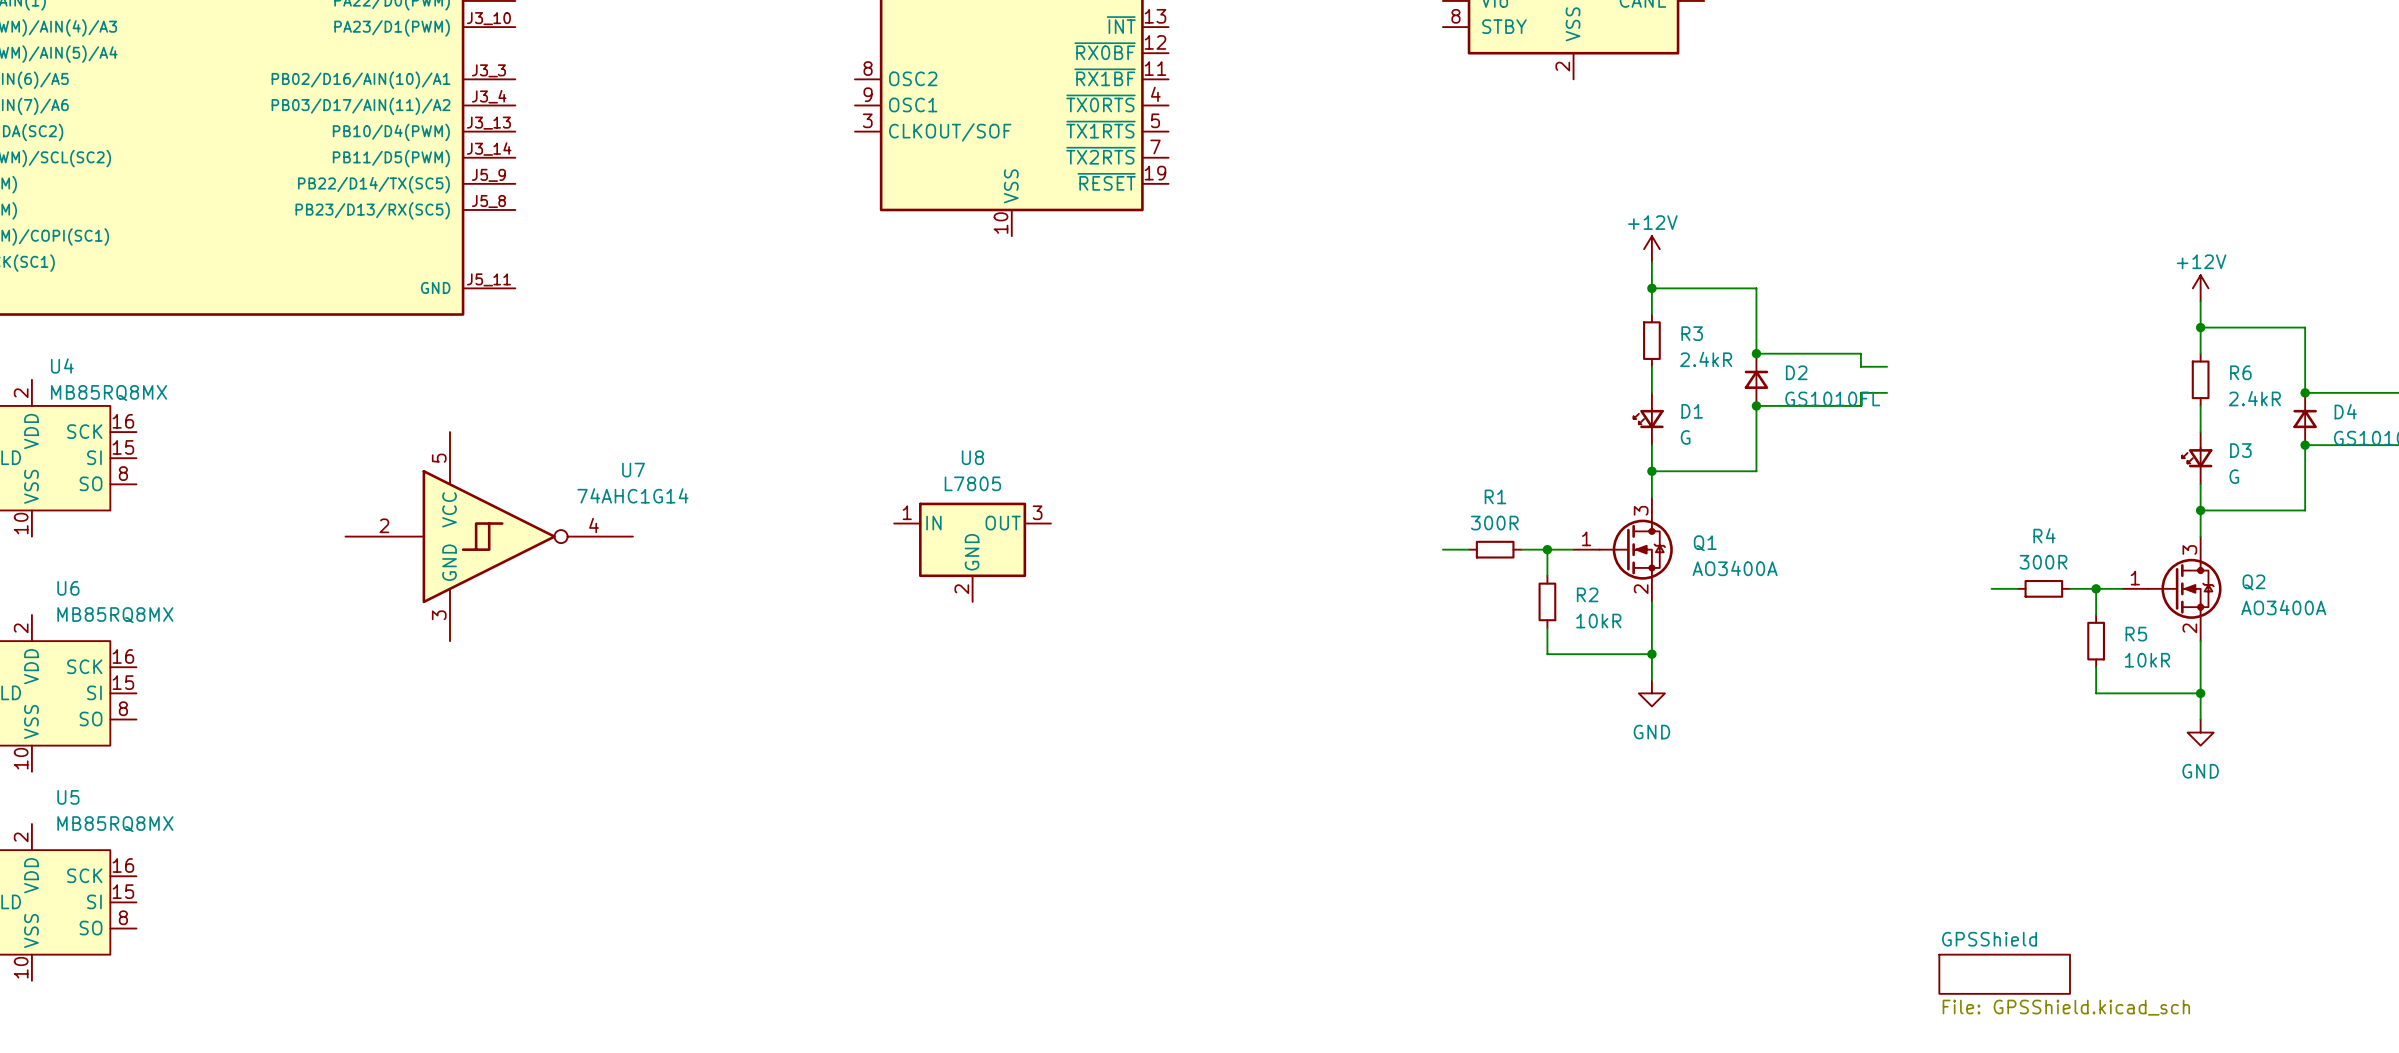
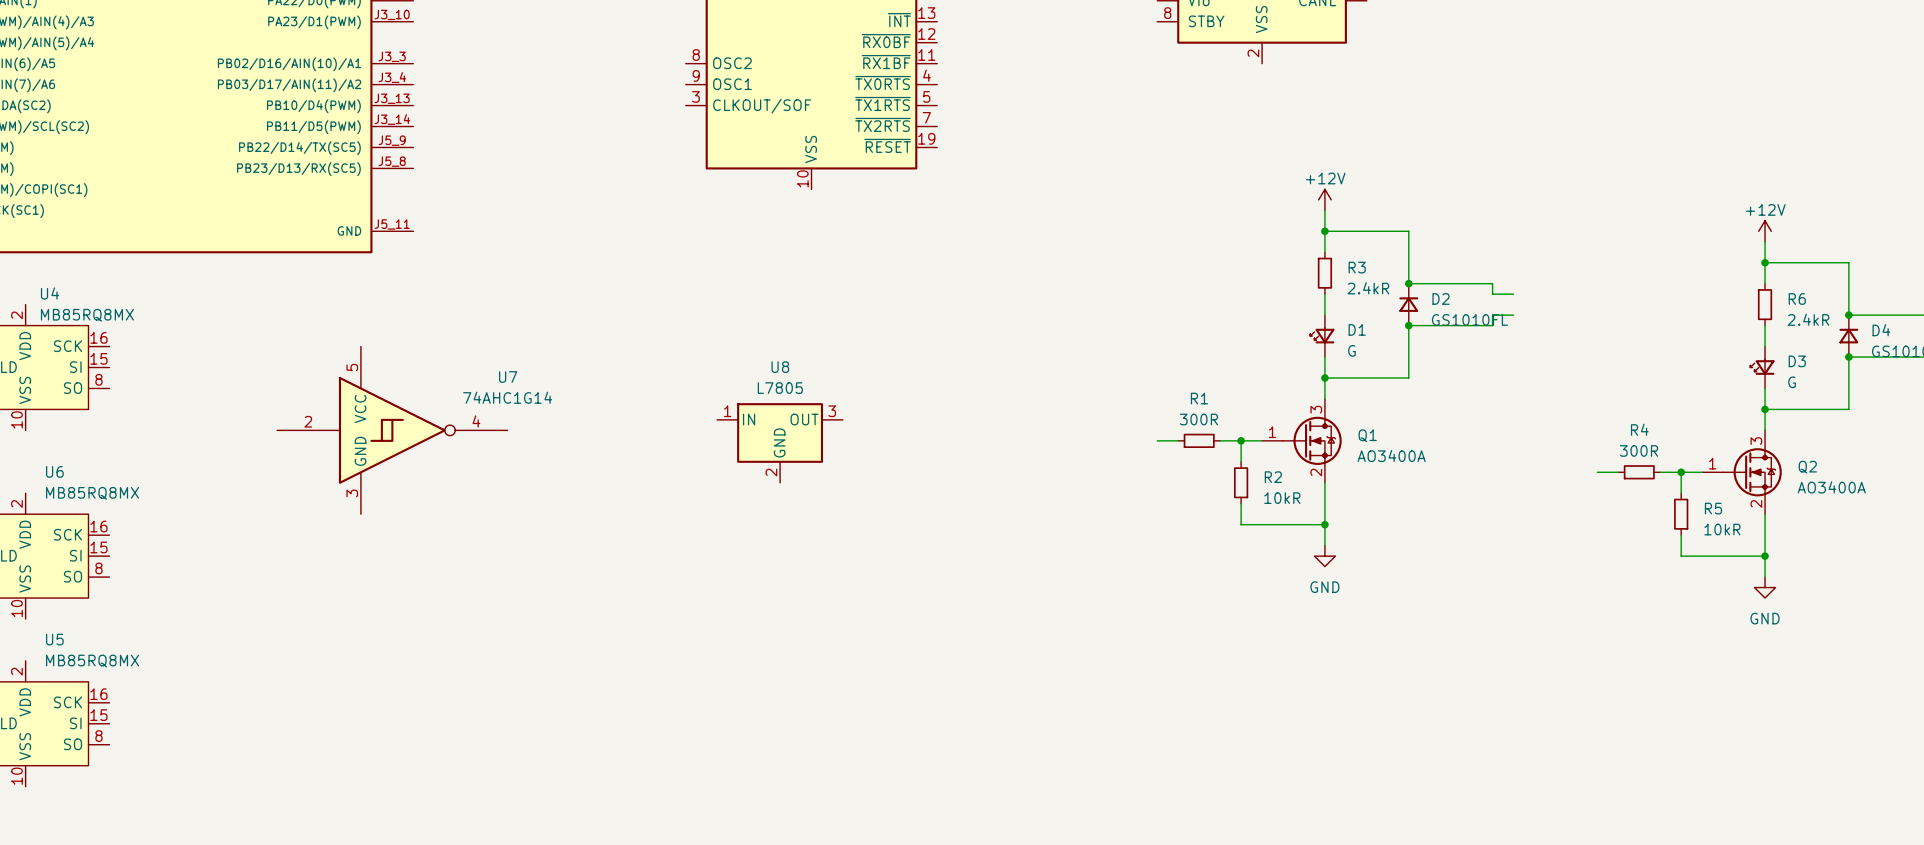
sheet GPSShield: File: GPSShield.kicad_sch (2004, 974) -> none

